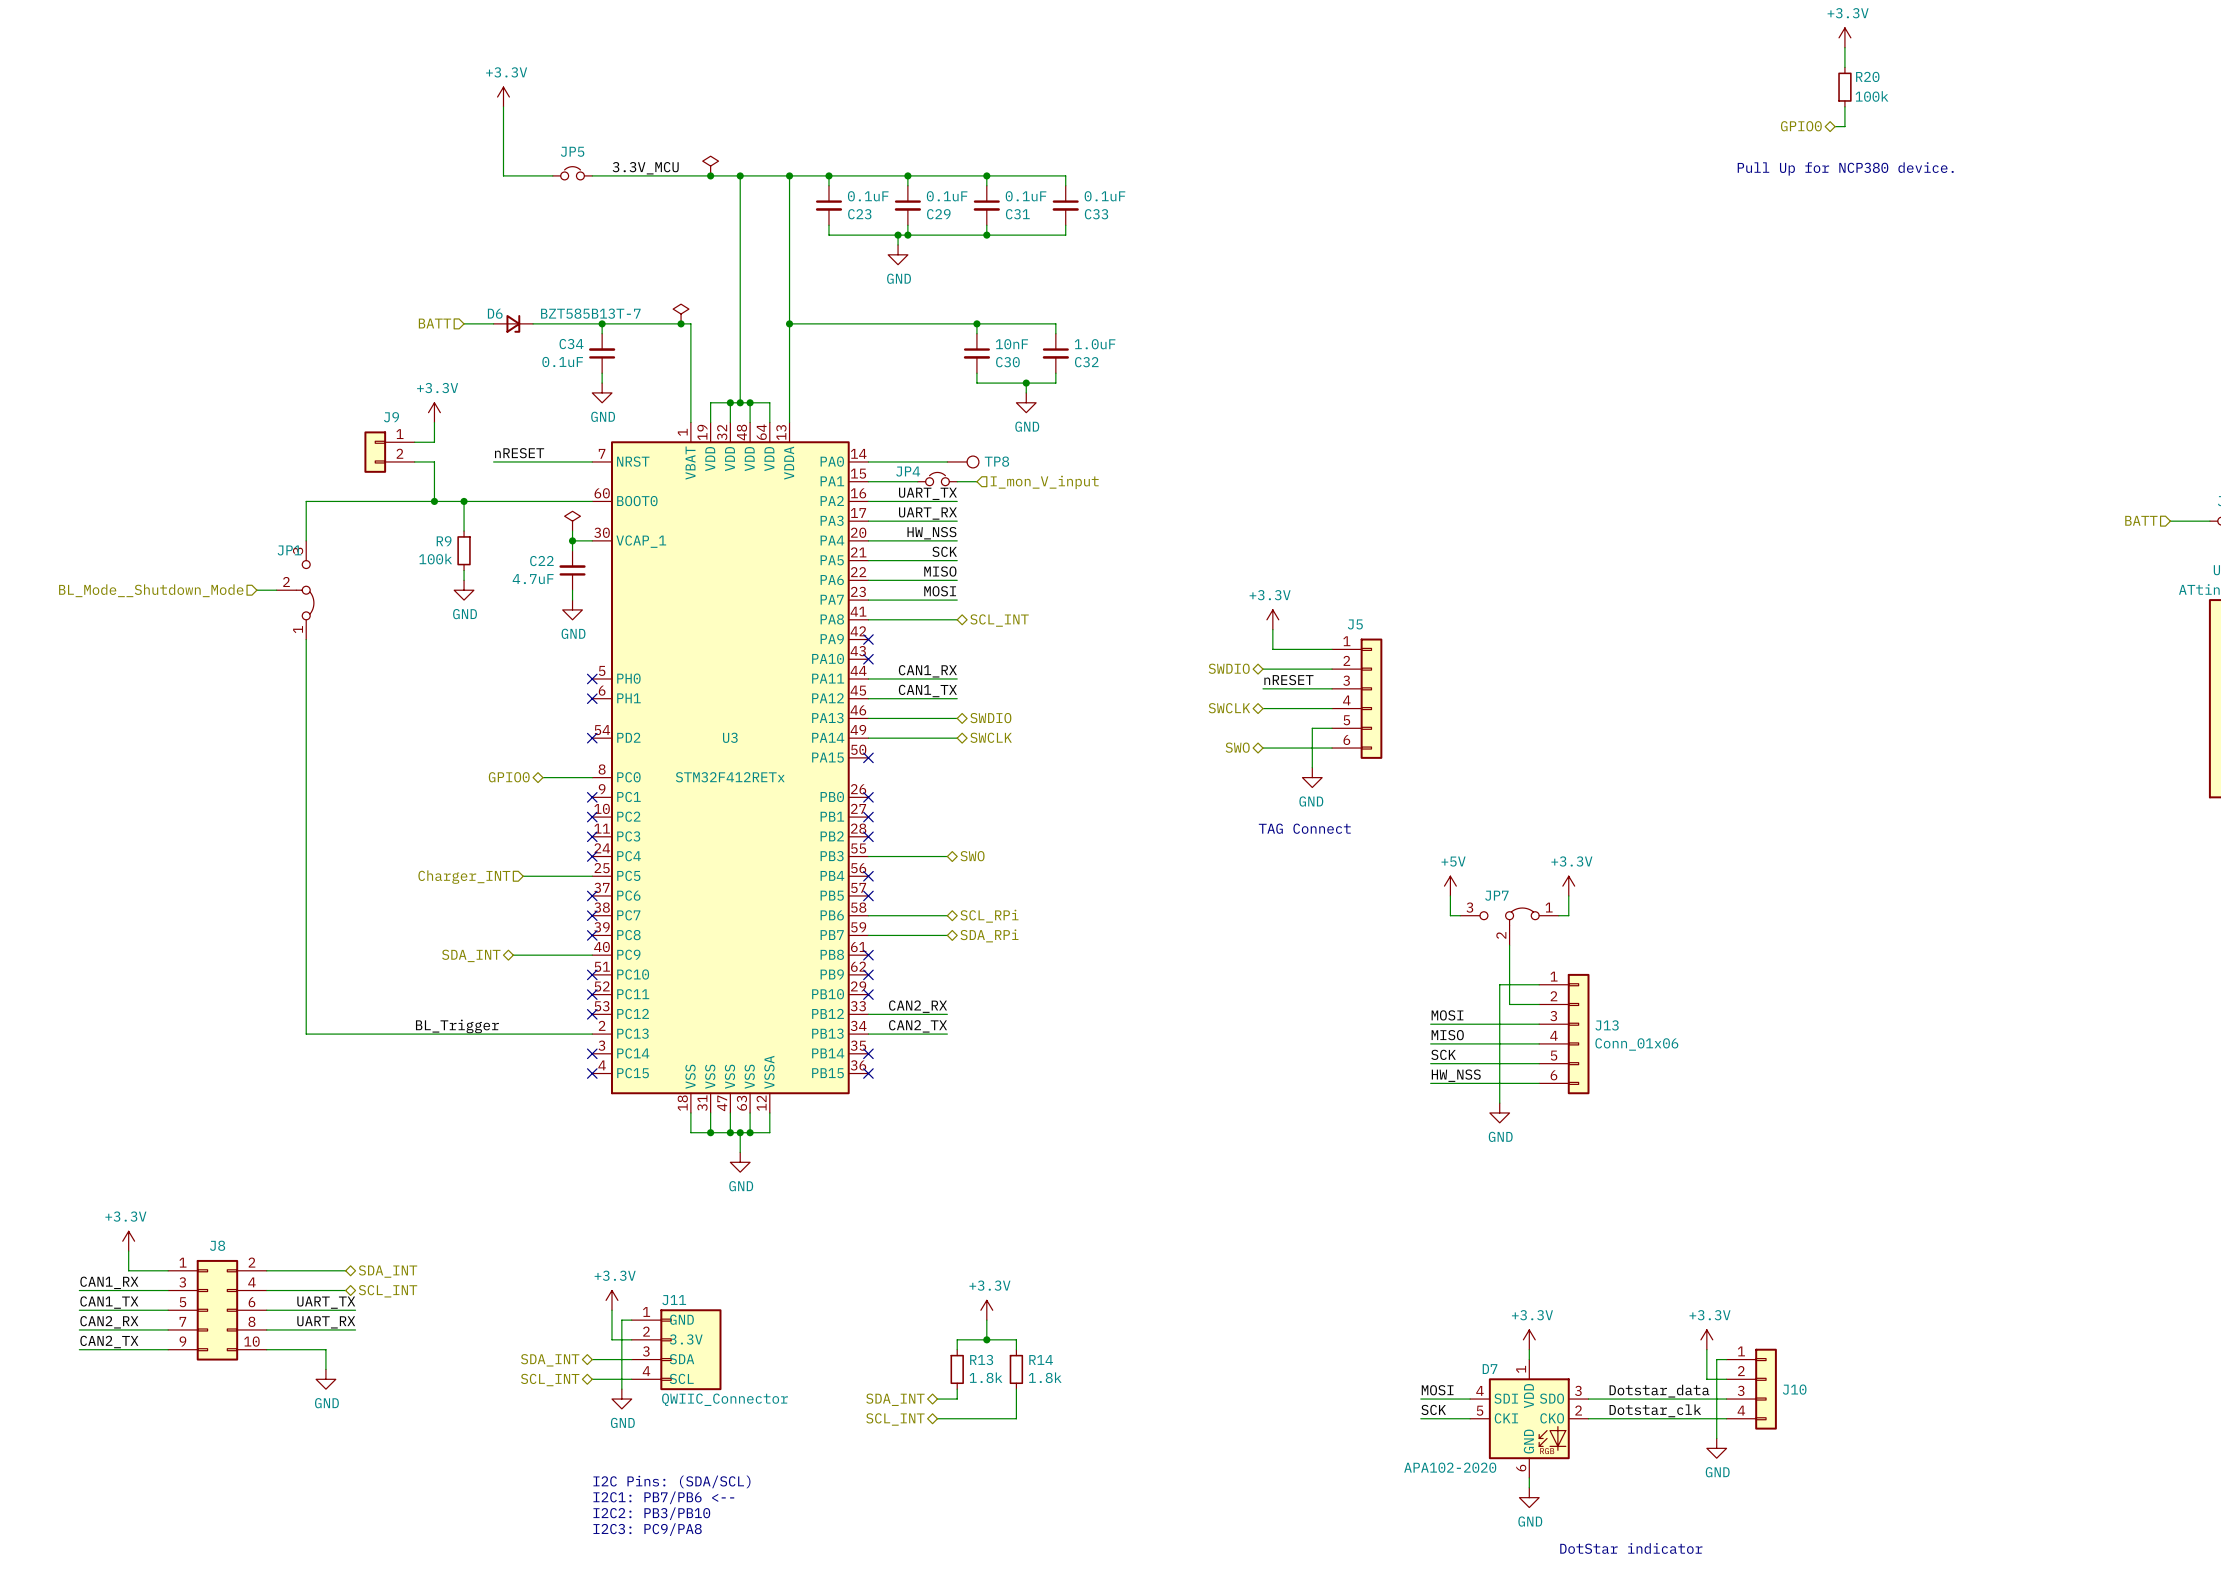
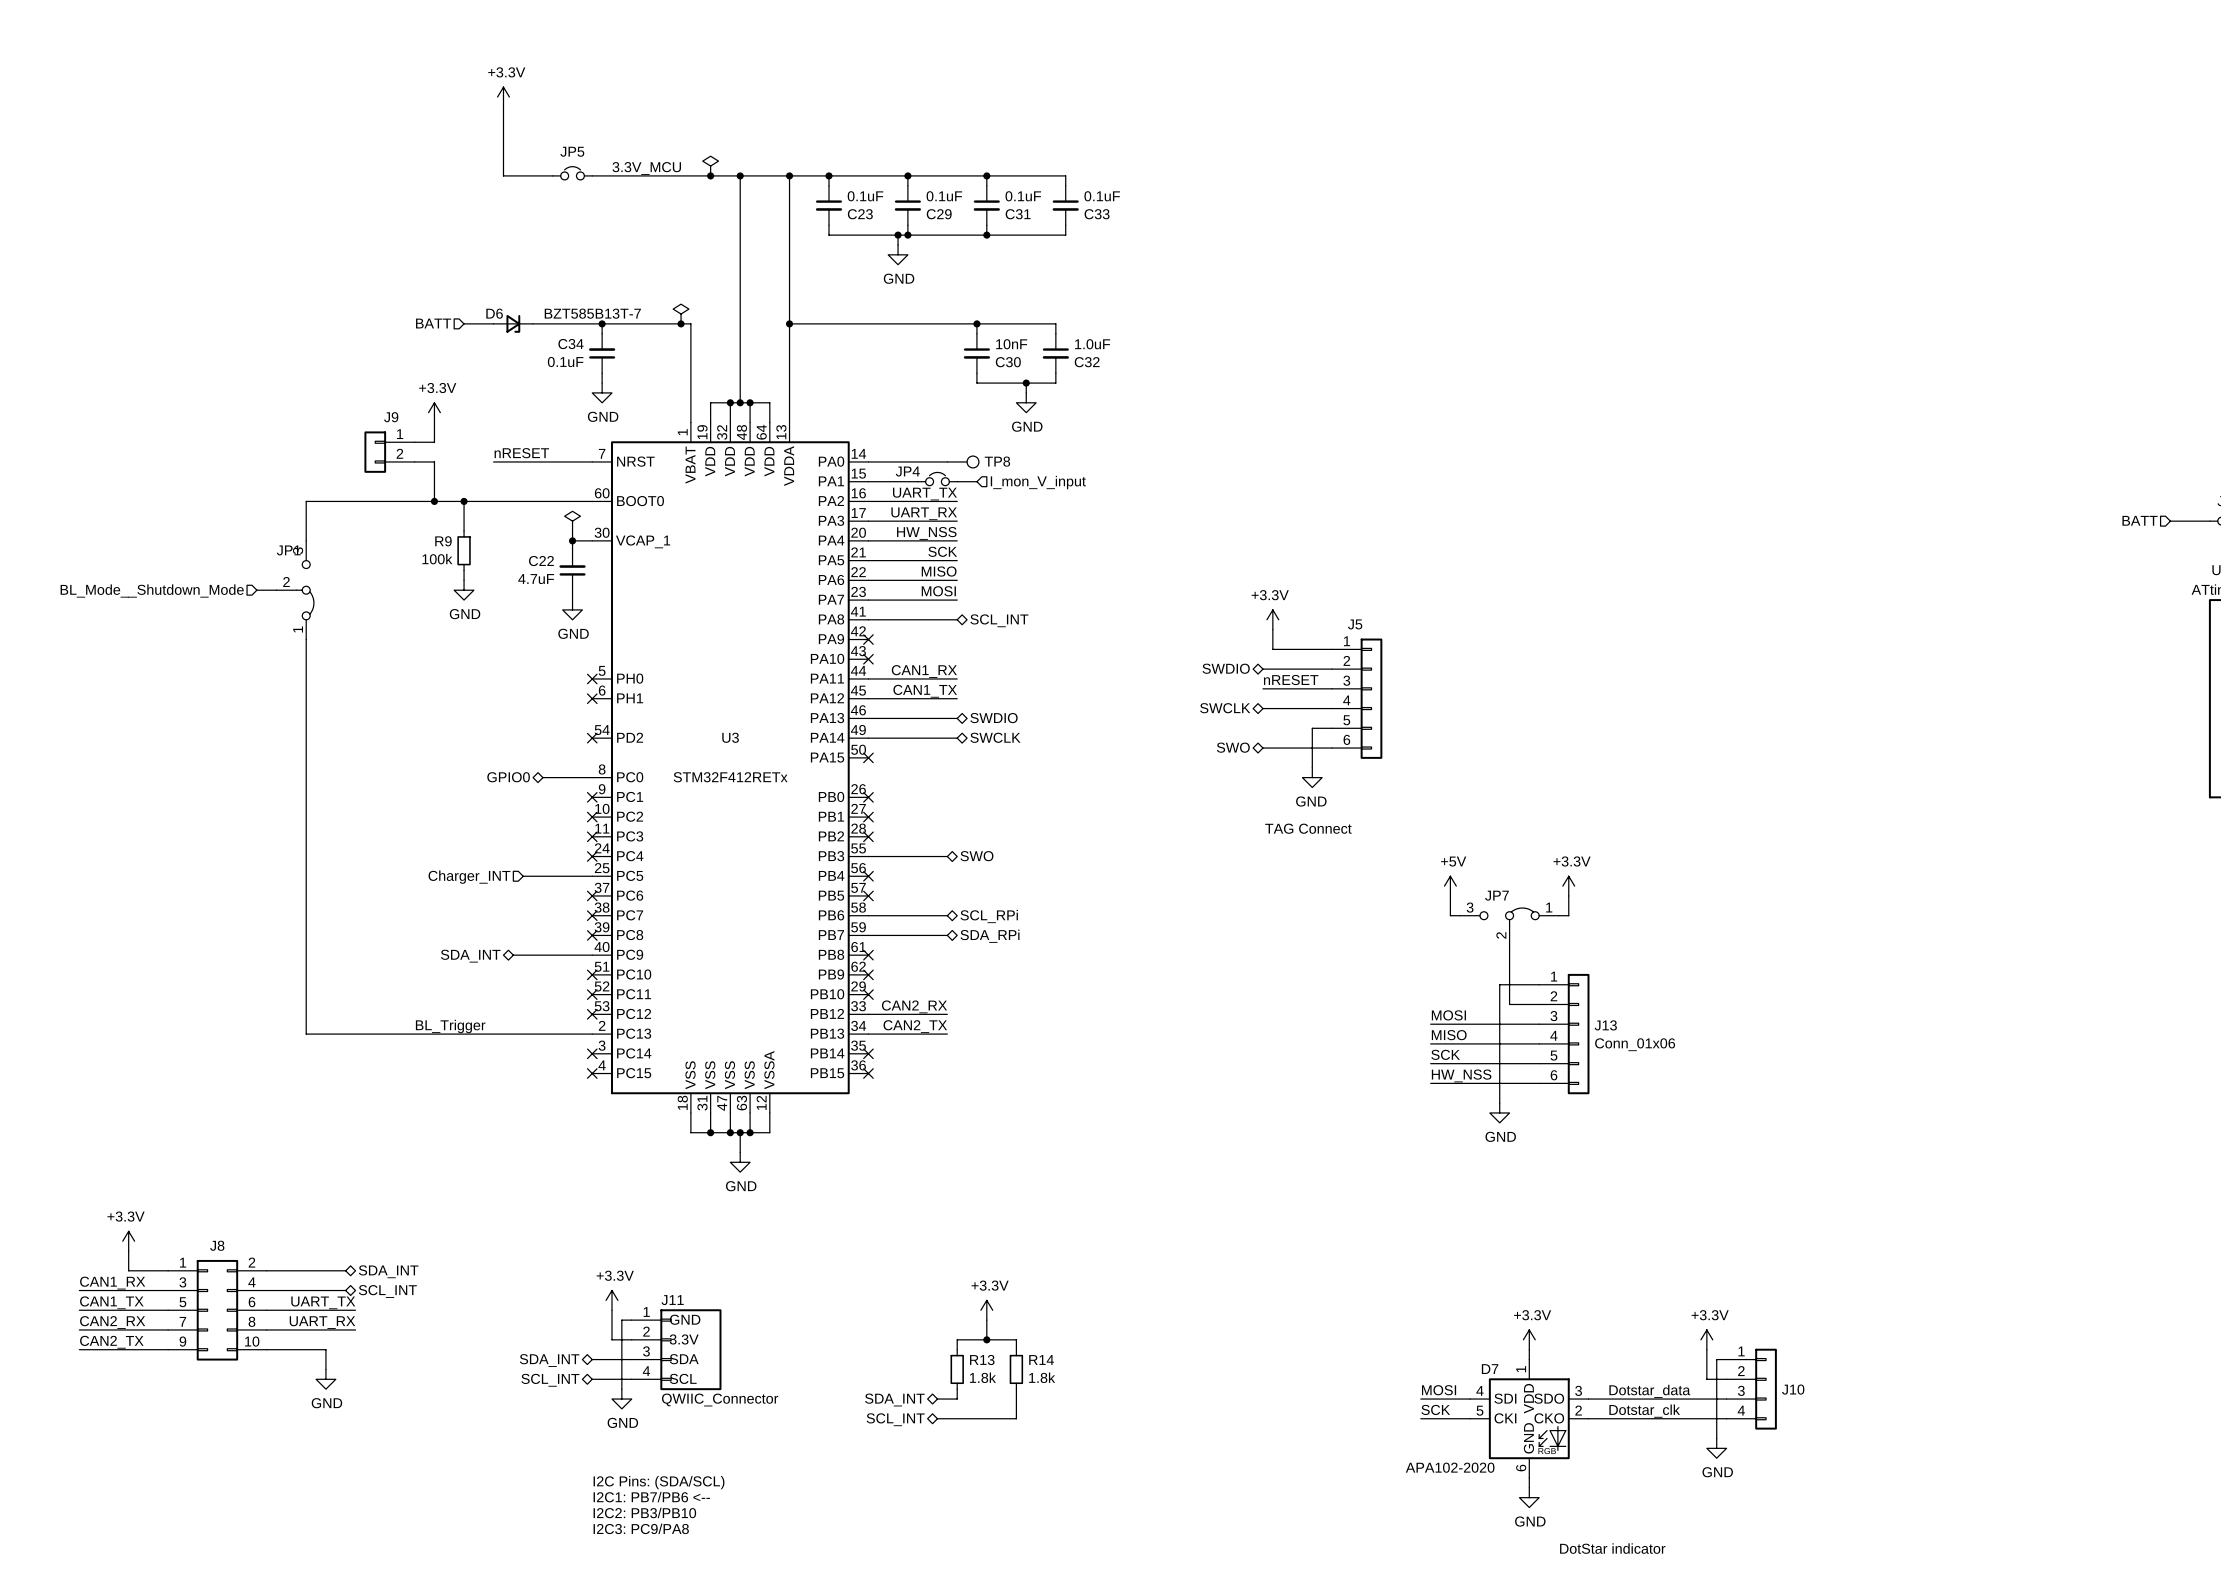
power symbol: +3.3V (1844, 37) -> none
wire: (1844, 47) (1844, 67) -> none
R20: 100k (1844, 87) -> none
wire: (1844, 106) (1844, 126) (1835, 126) -> none
hierarchical label: GPIO0 (1801, 126) -> none
text: Pull Up for NCP380 device. (1845, 168) -> none

